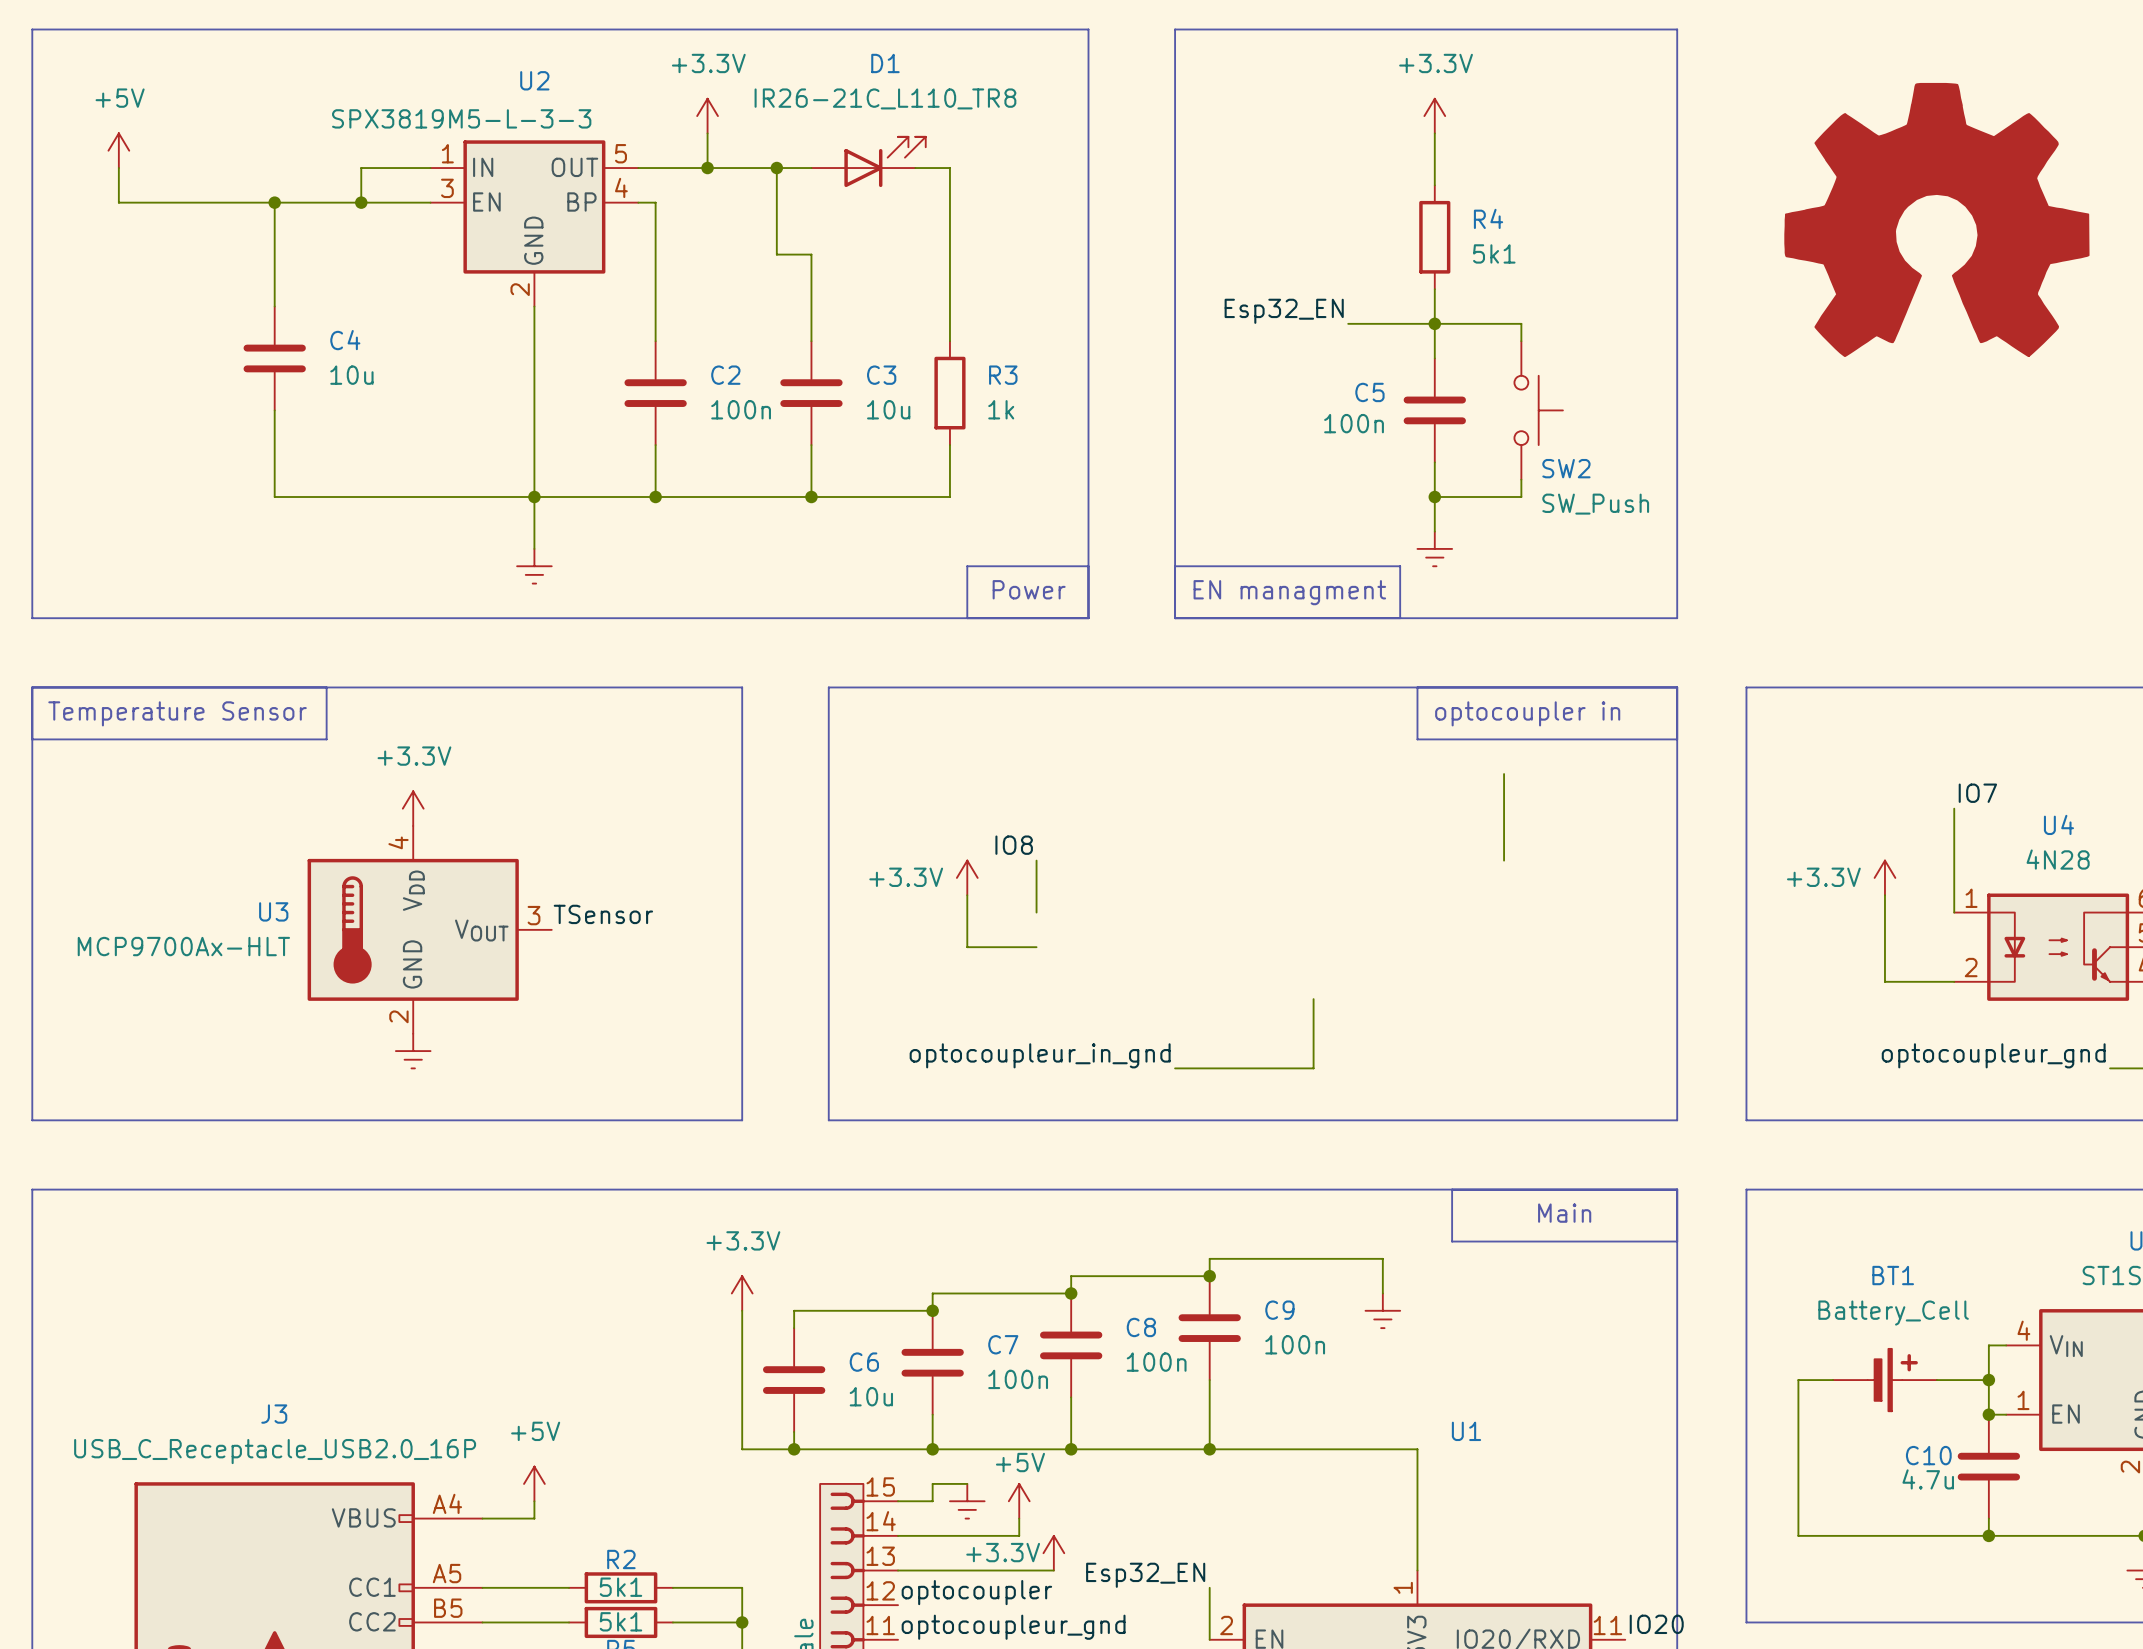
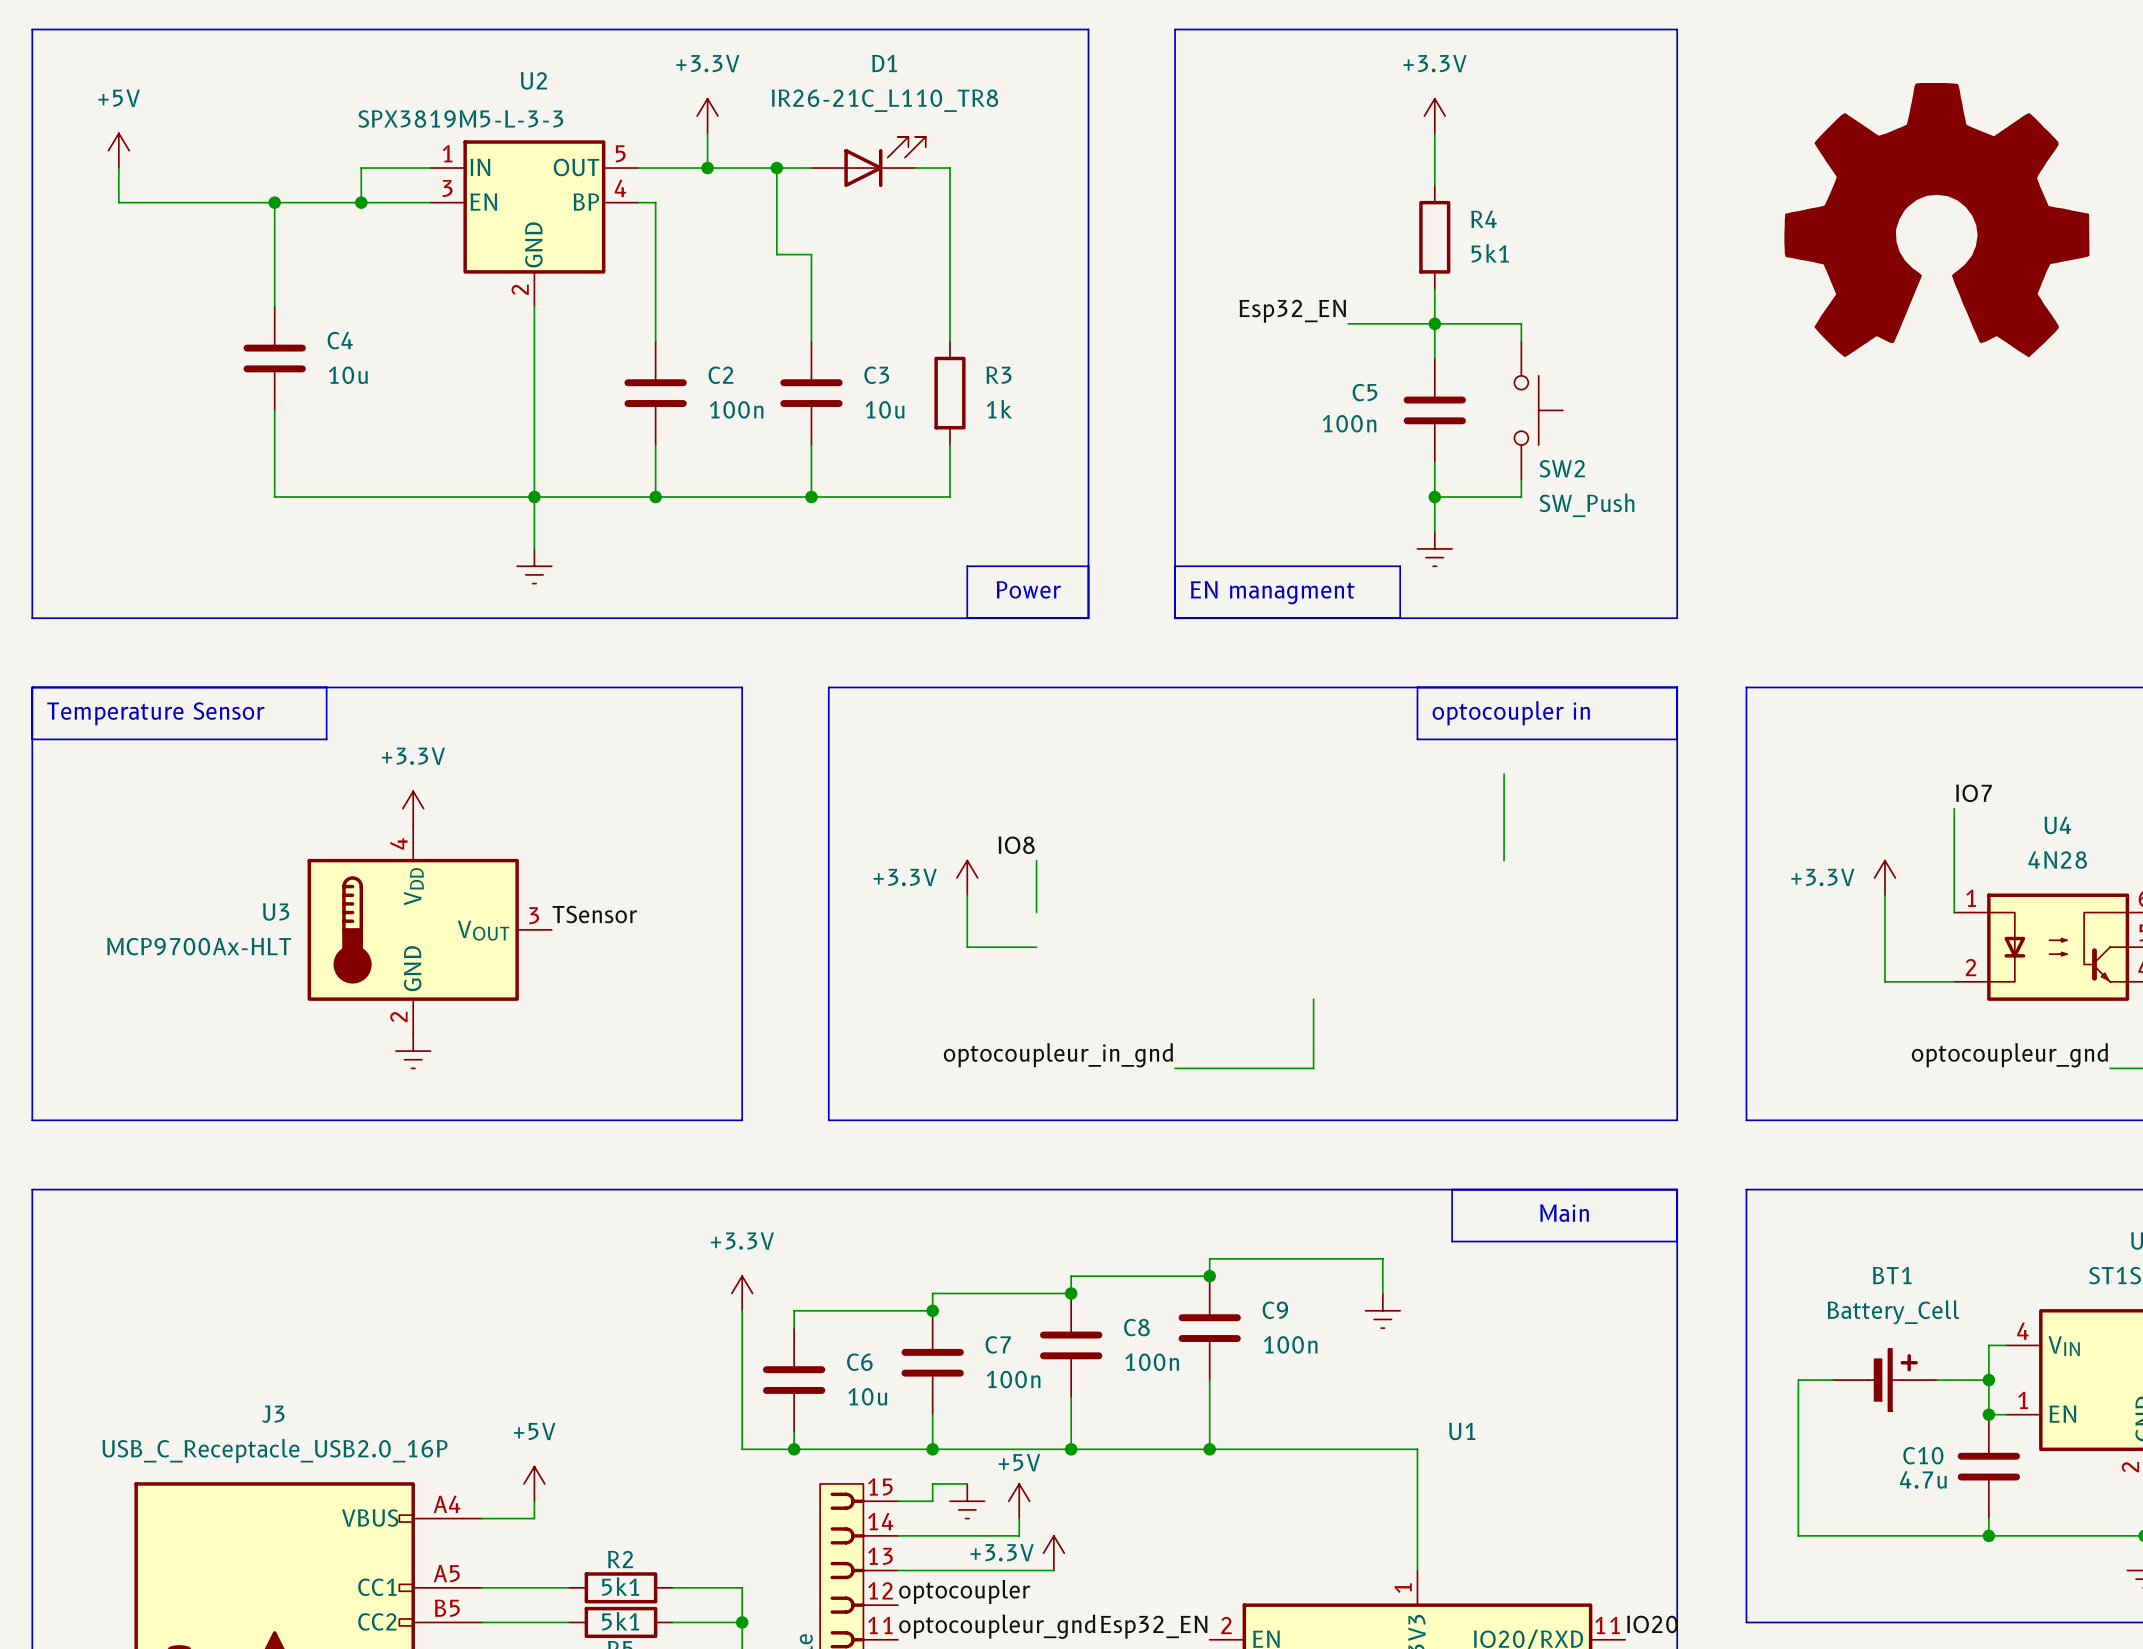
label position: Esp32_EN (1145, 1575) -> Esp32_EN (1154, 1627)
wire: (1209, 1587) (1209, 1639) -> none

